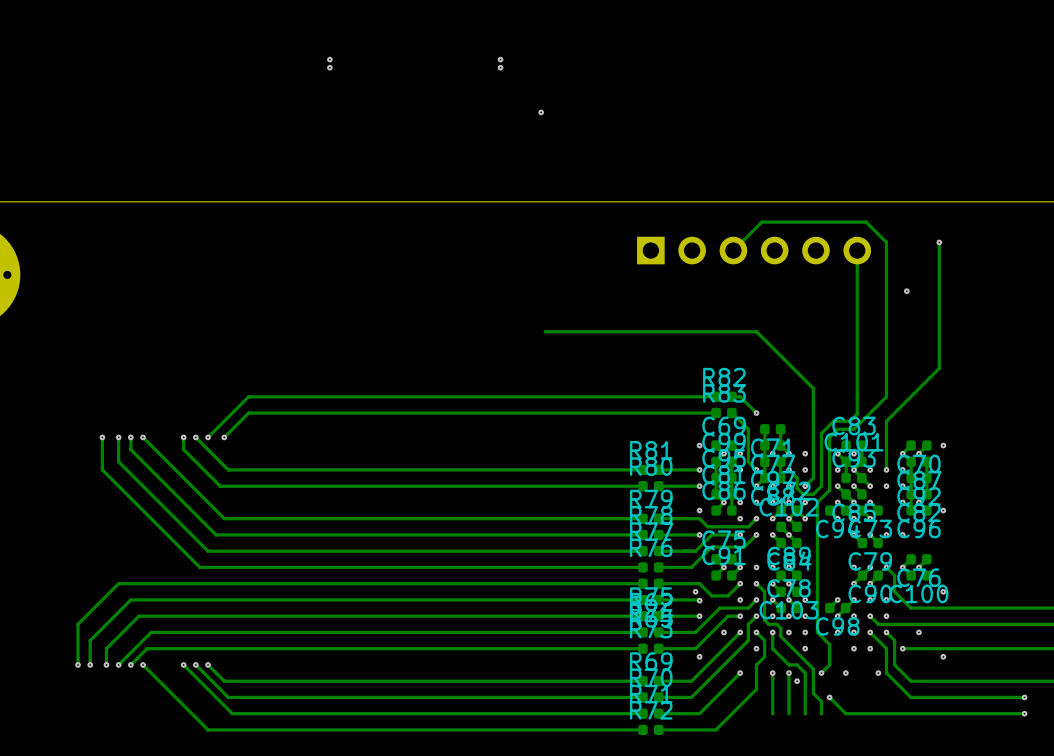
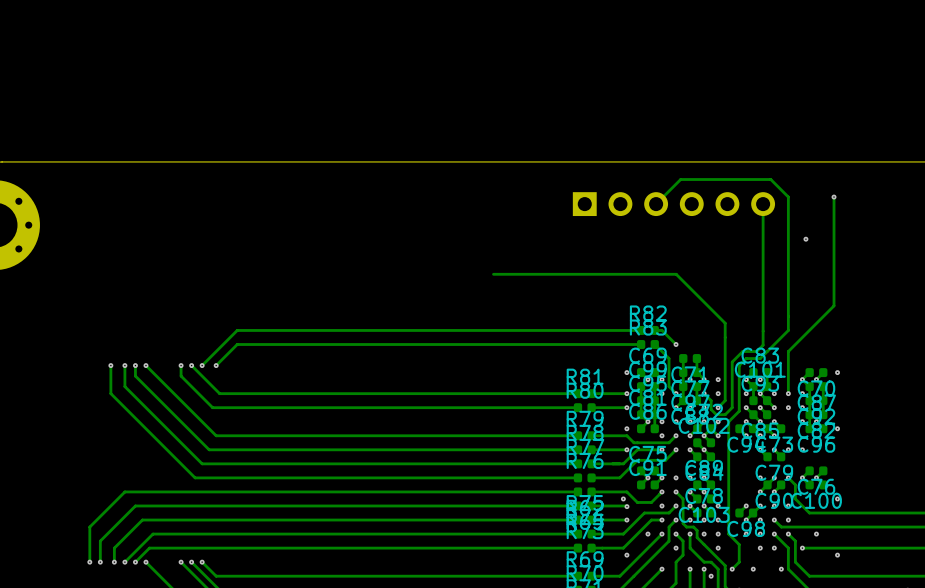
via: (329, 59) -> none
via: (500, 59) -> none
via: (329, 67) -> none
via: (500, 67) -> none
via: (541, 112) -> none

